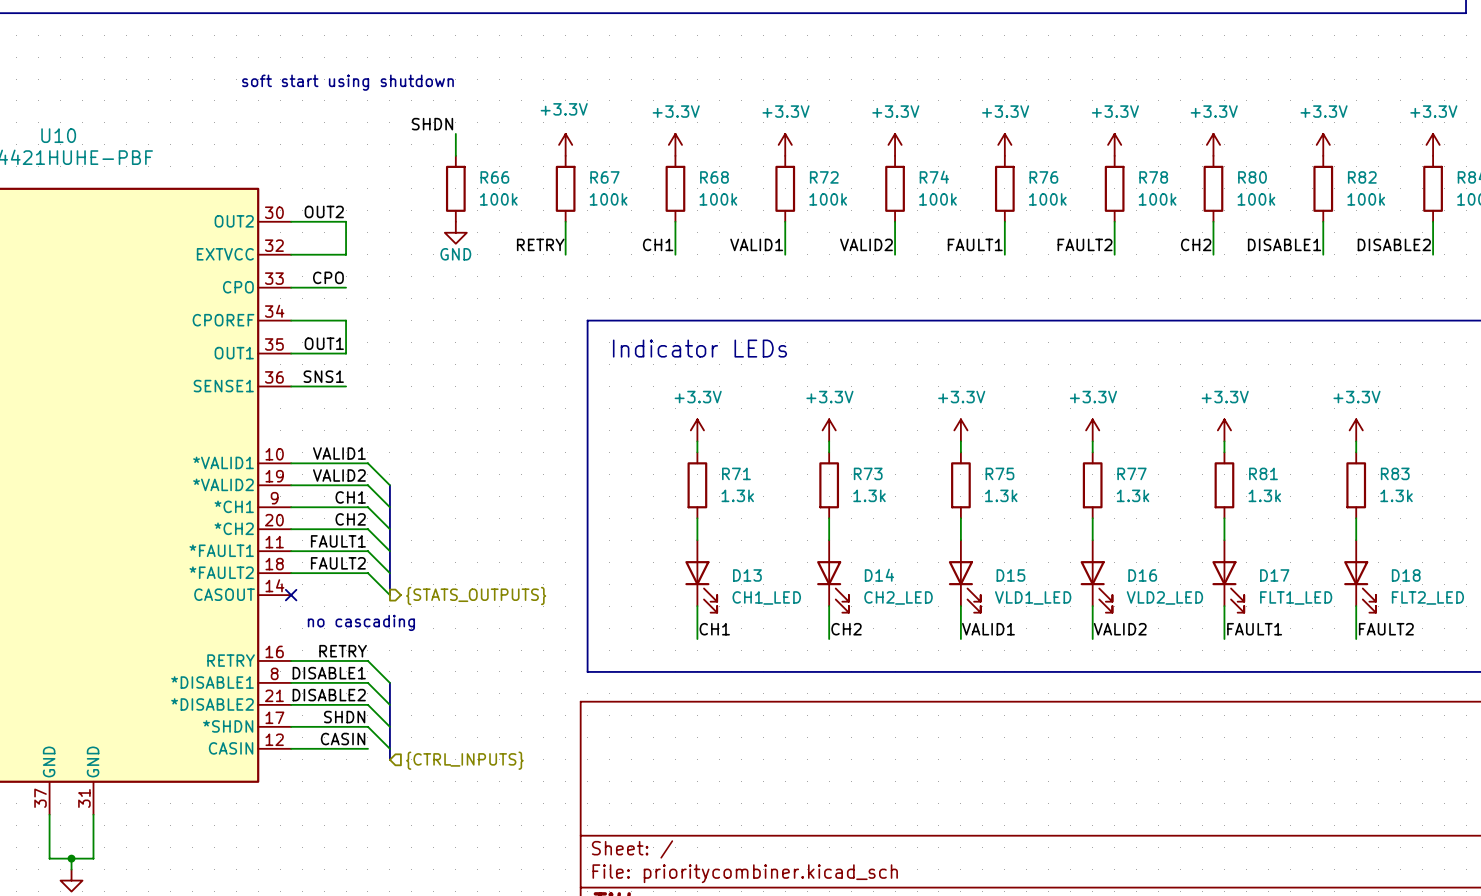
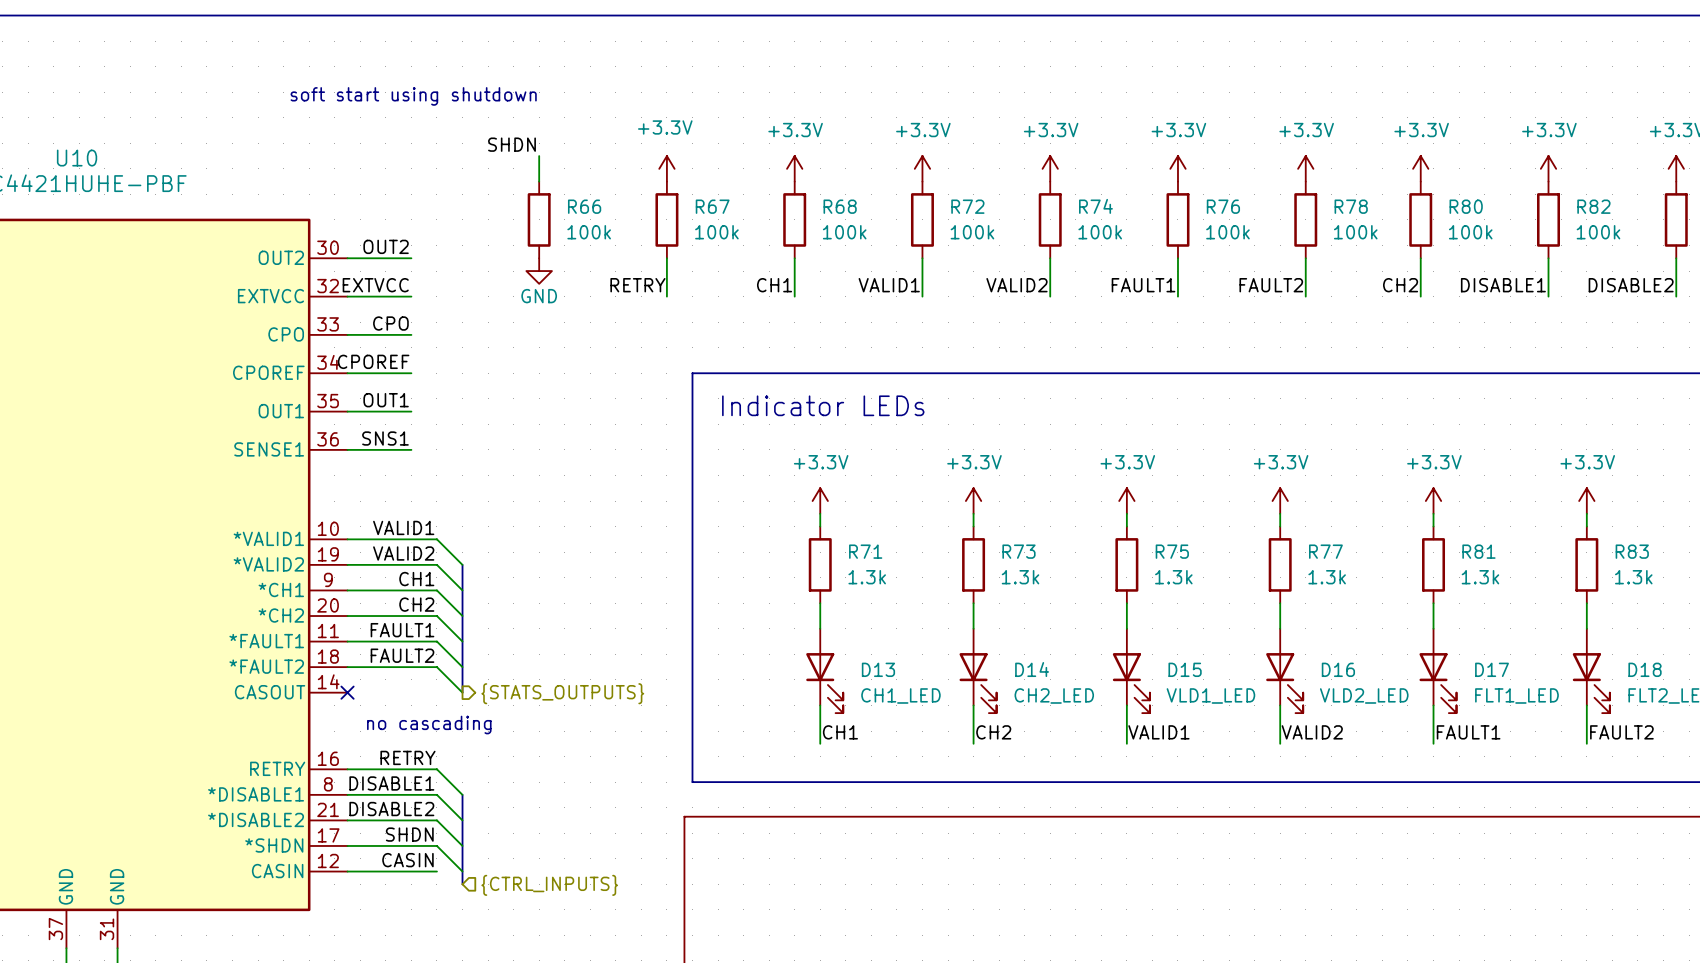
wire: (346, 221) (346, 254) -> none
label: none -> EXTVCC (375, 285)
label: none -> CPOREF (373, 361)
wire: (346, 320) (346, 353) -> none

